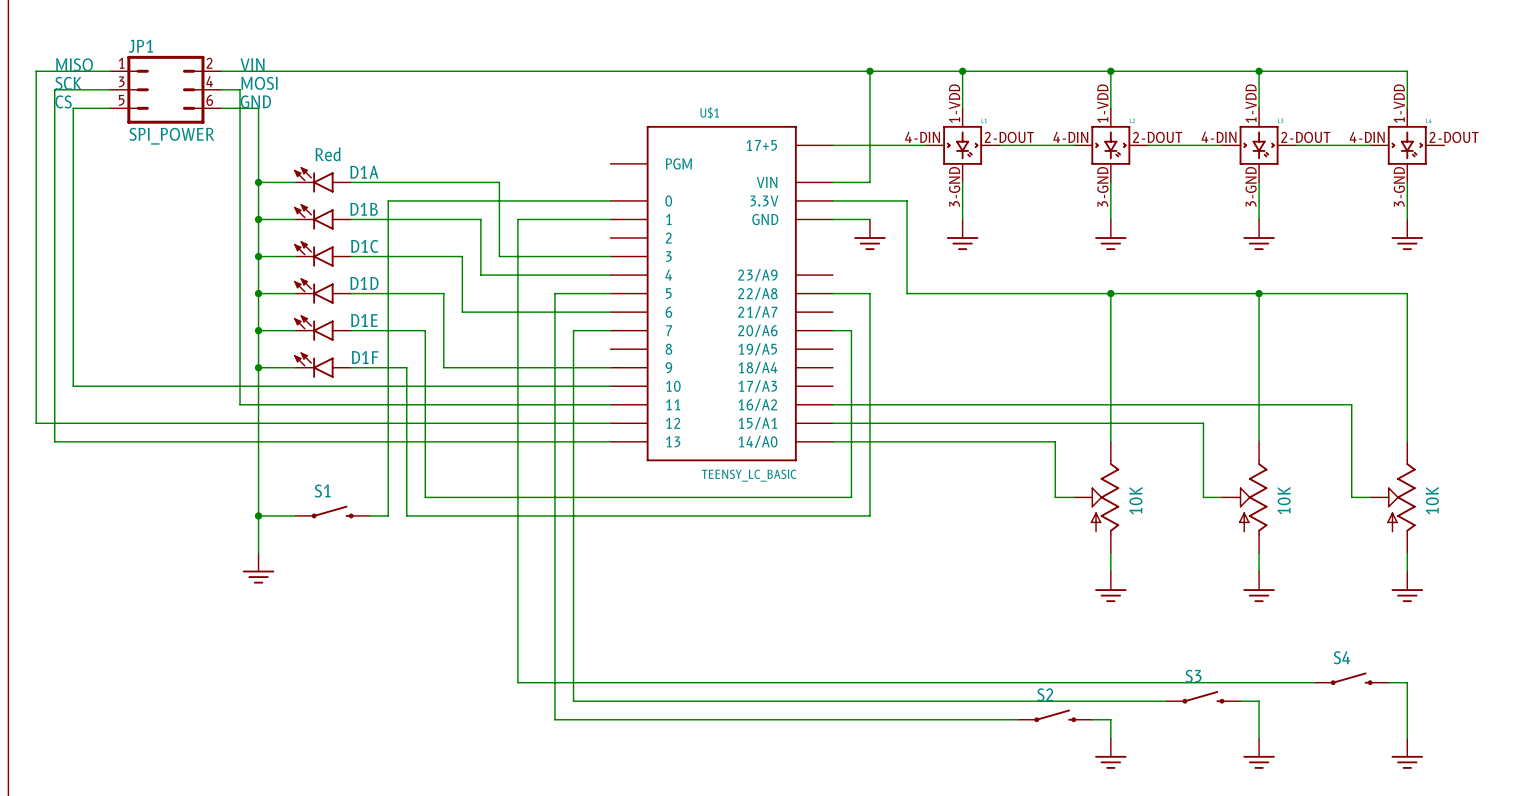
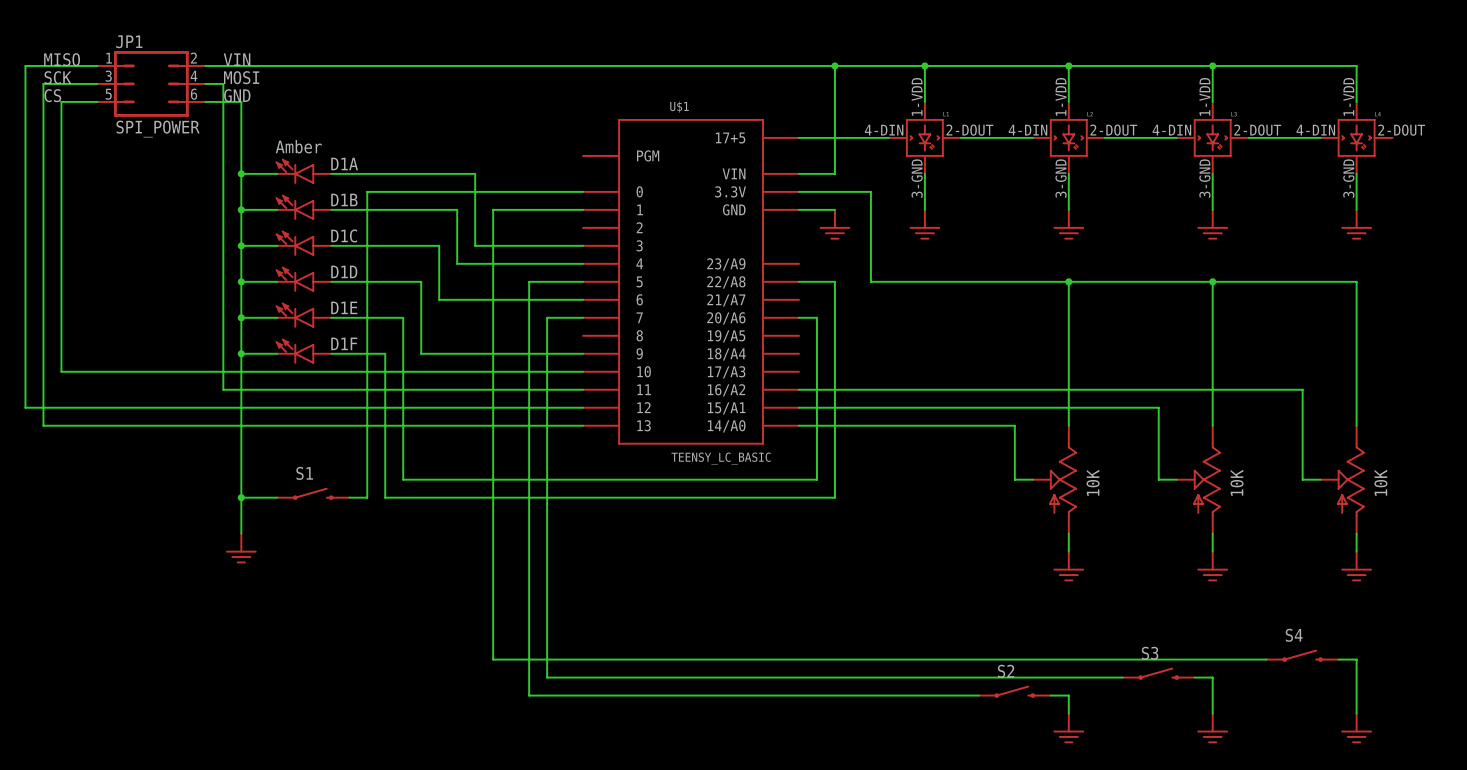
D1A value: Red (328, 154) -> Amber (298, 146)

